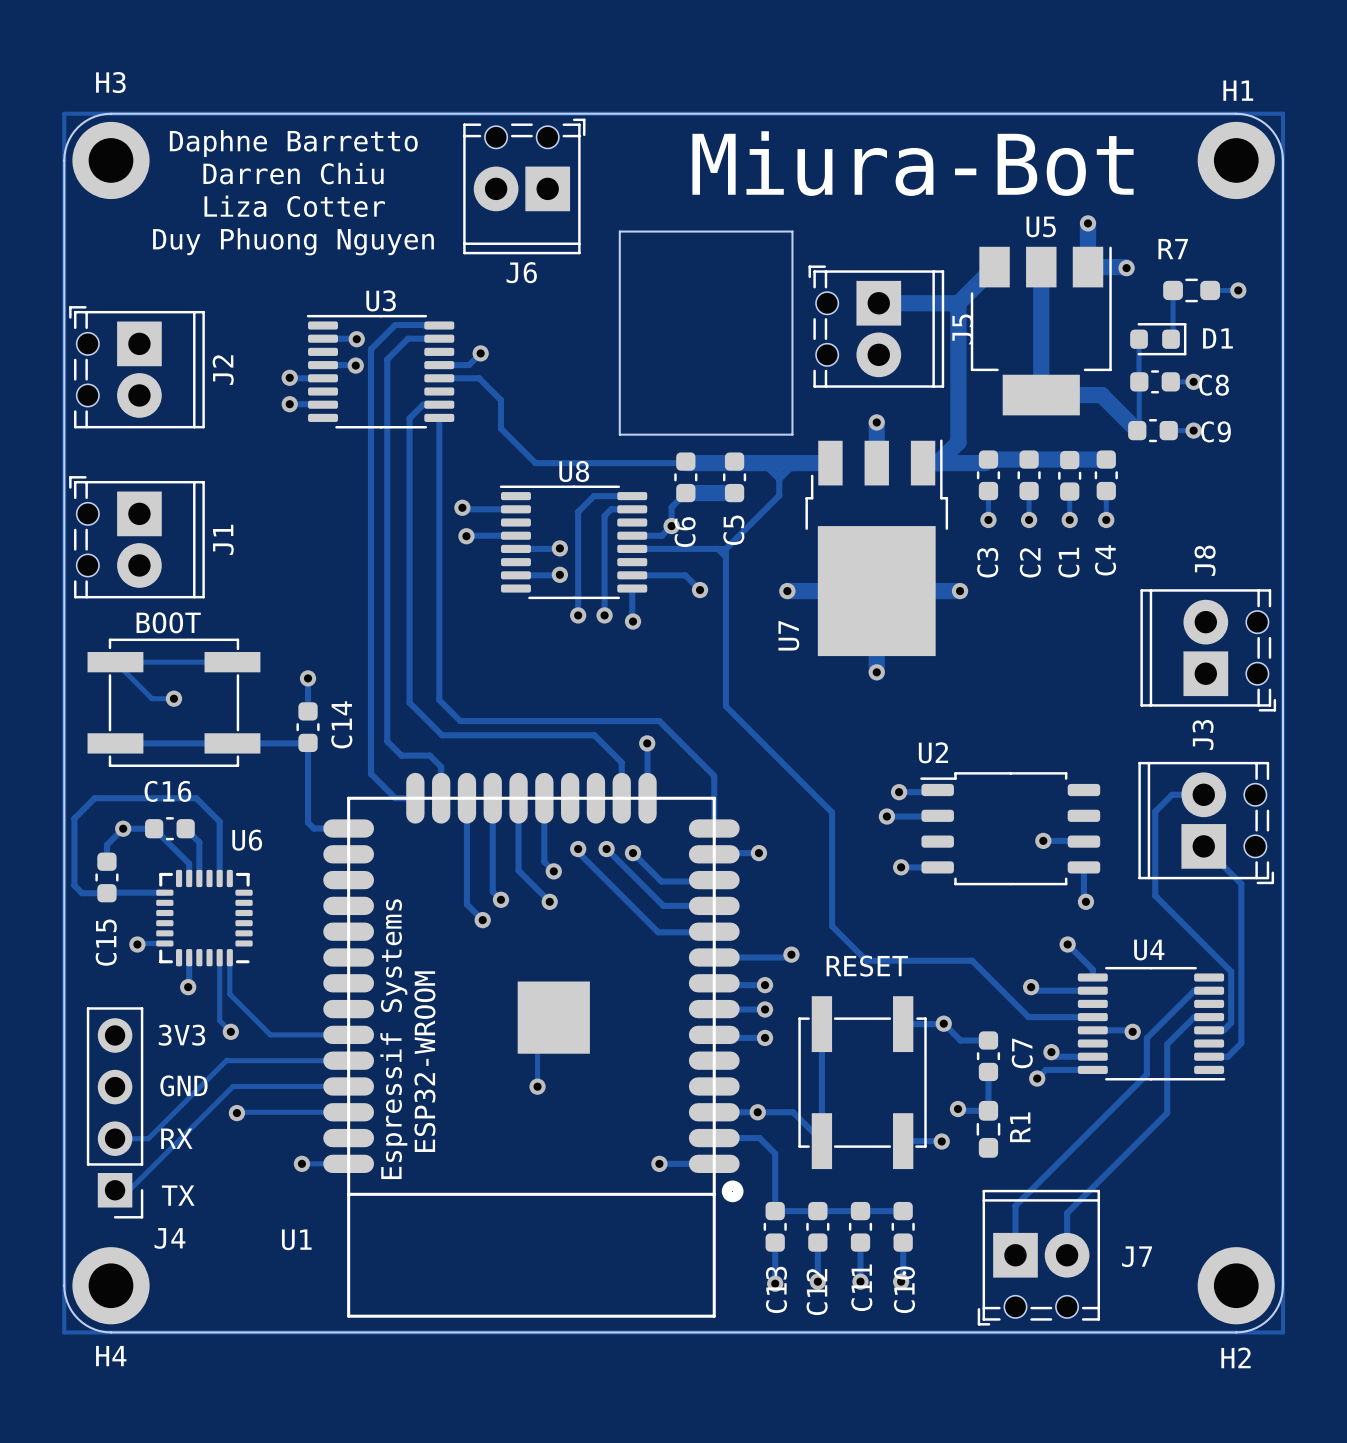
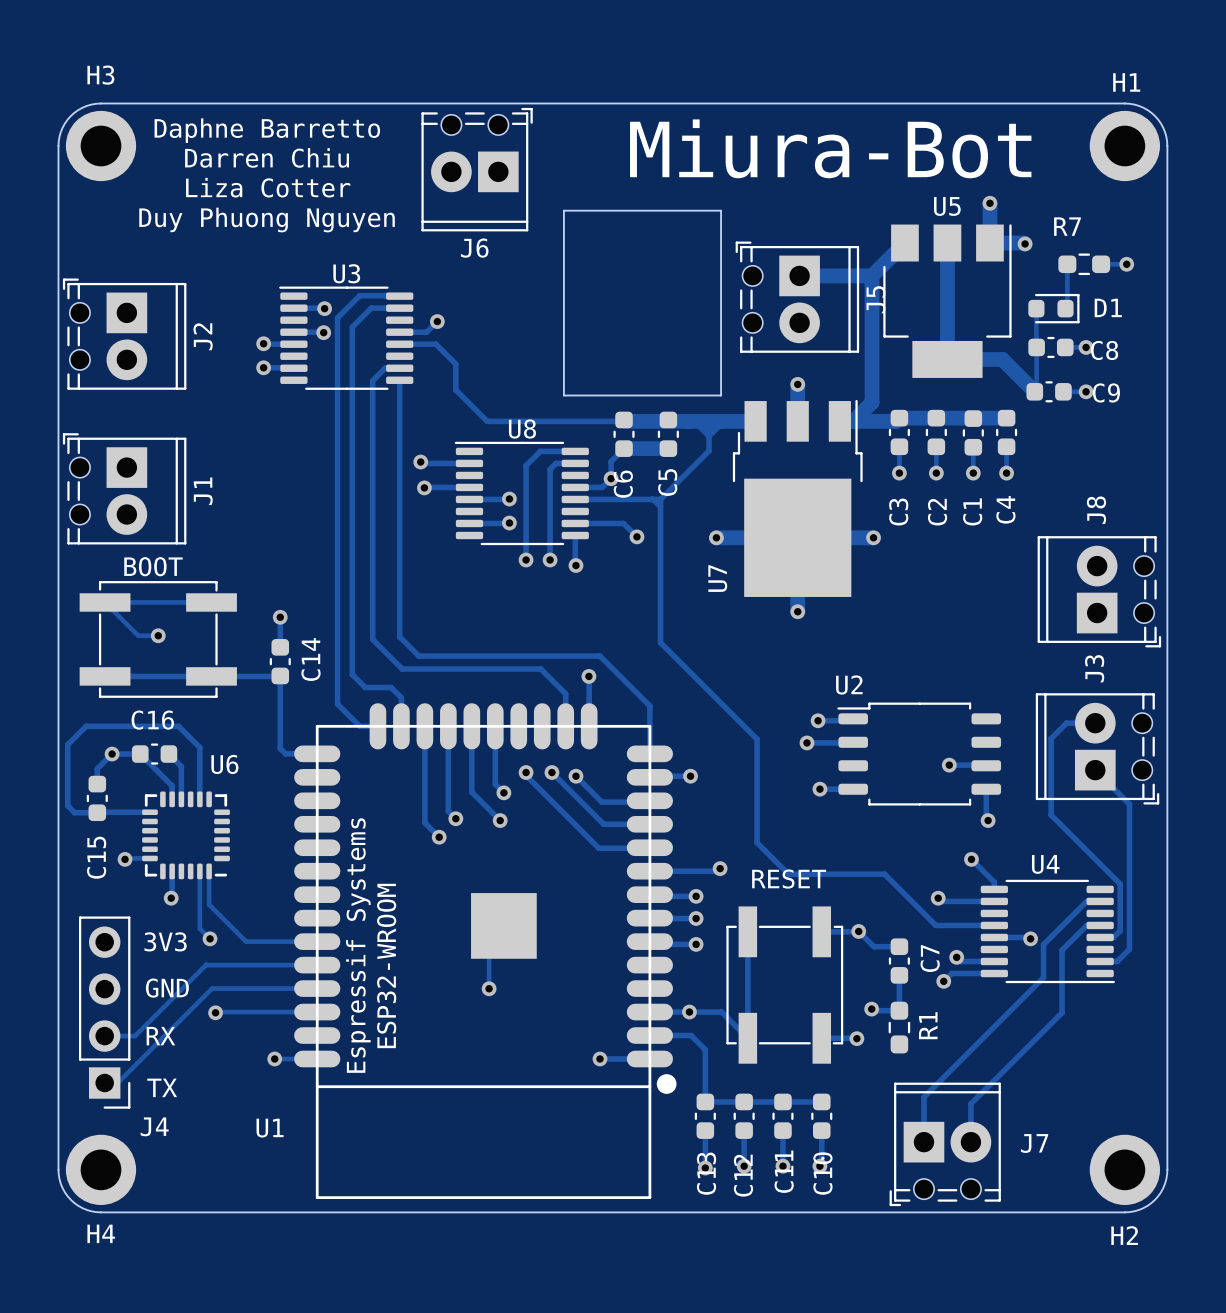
track: (64, 113) (1282, 113) (1282, 1332) (64, 1332) (64, 113) -> none

